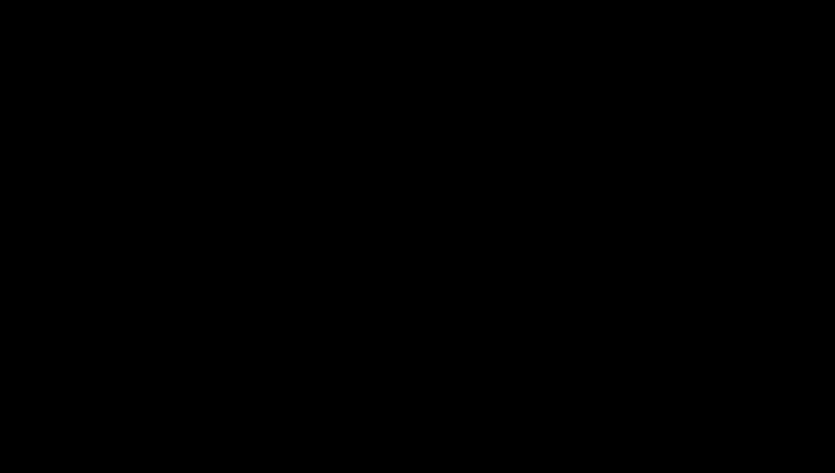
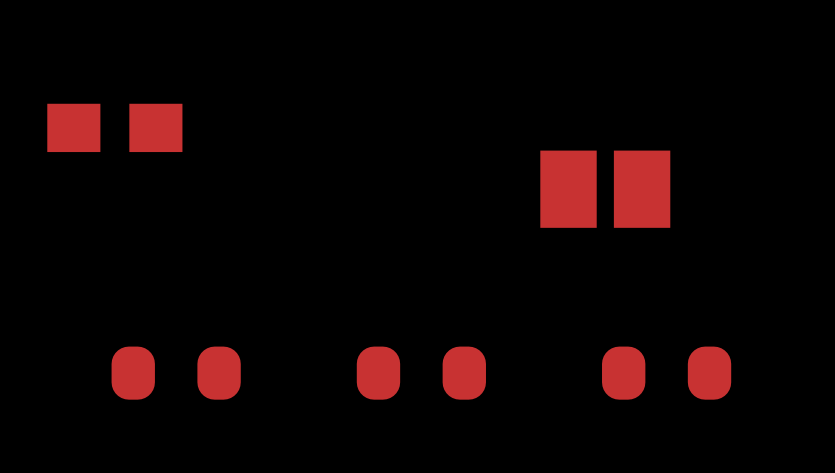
part: none -> (114, 127)
part: none -> (605, 189)
part: none -> (176, 373)
part: none -> (421, 373)
part: none -> (666, 373)

